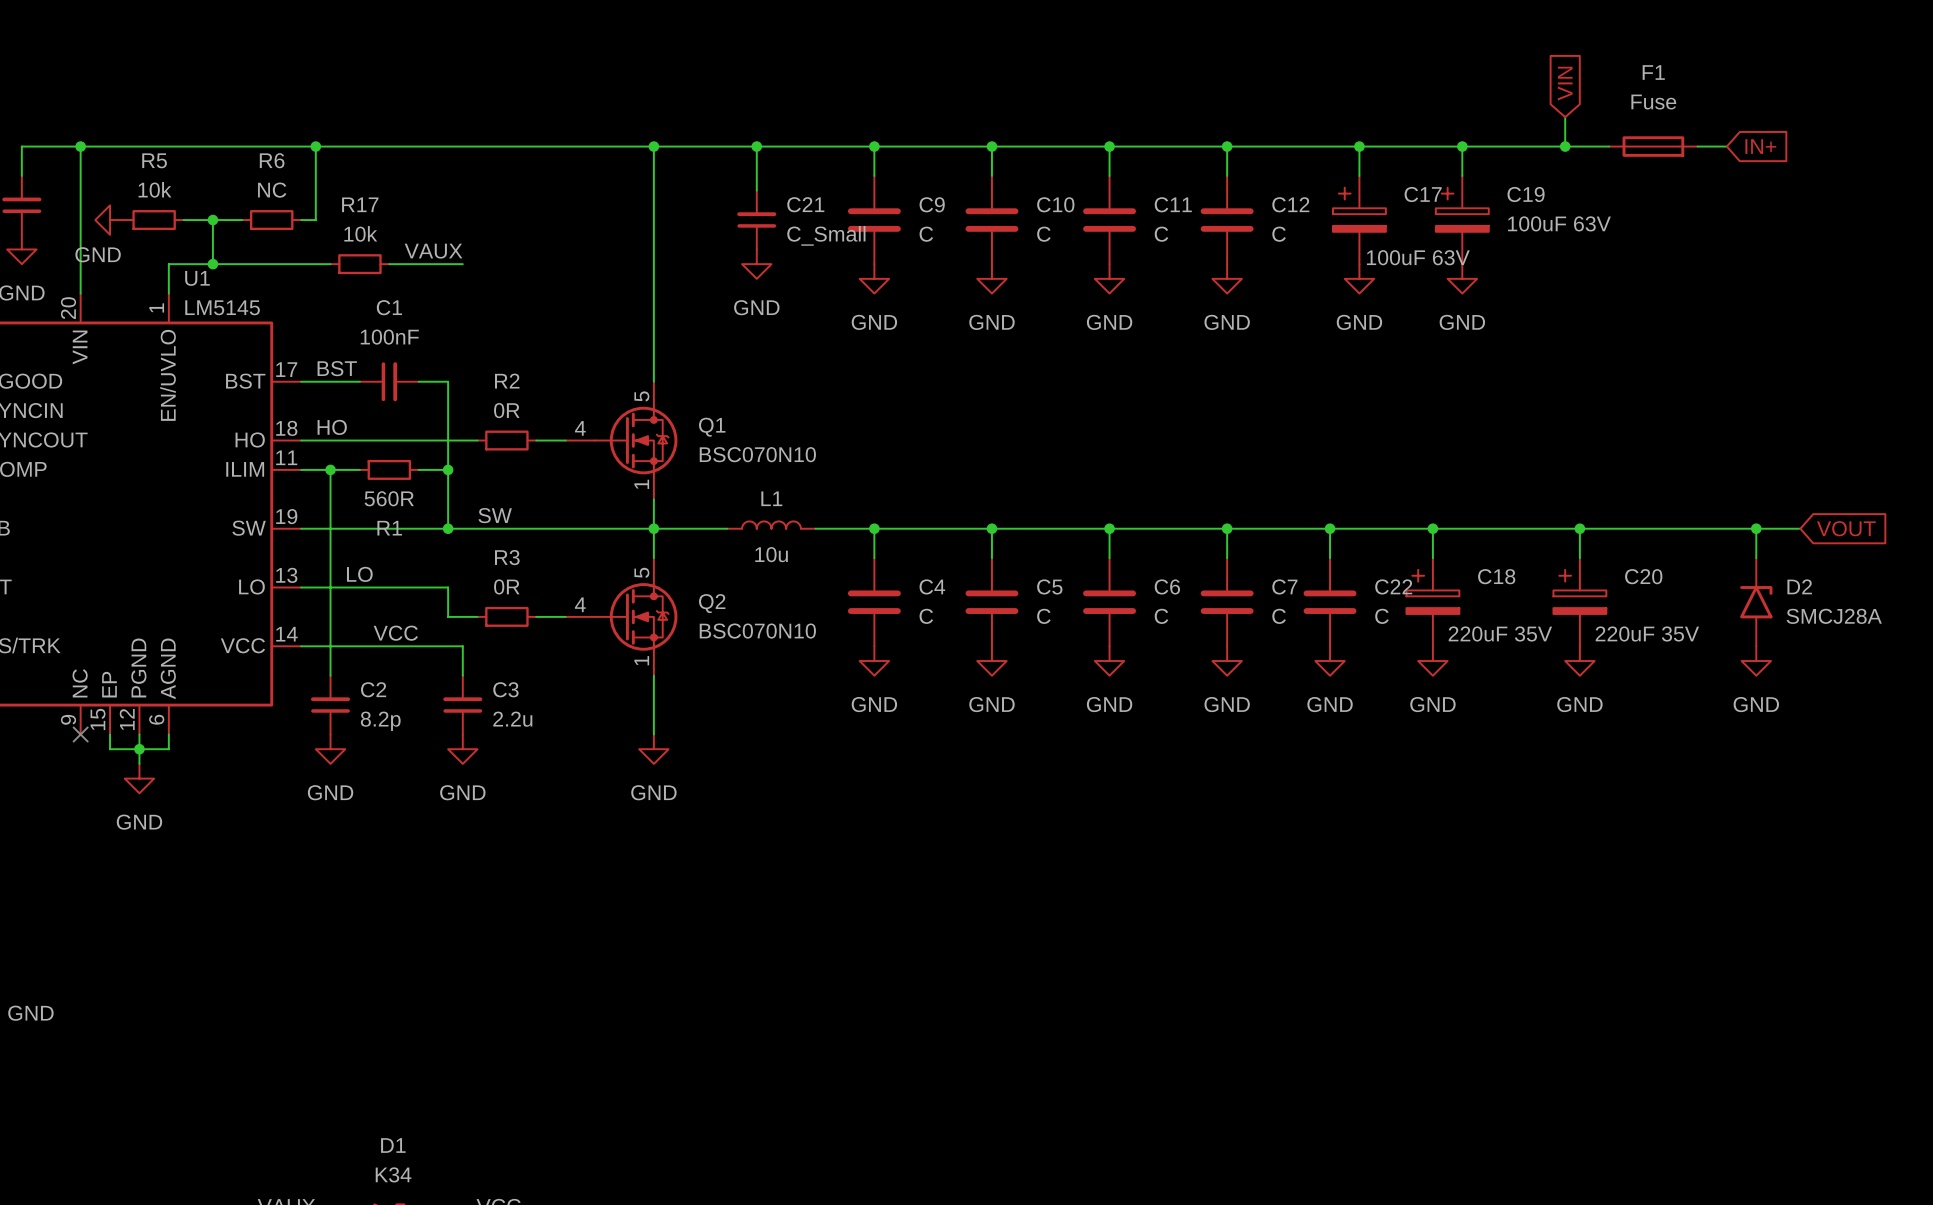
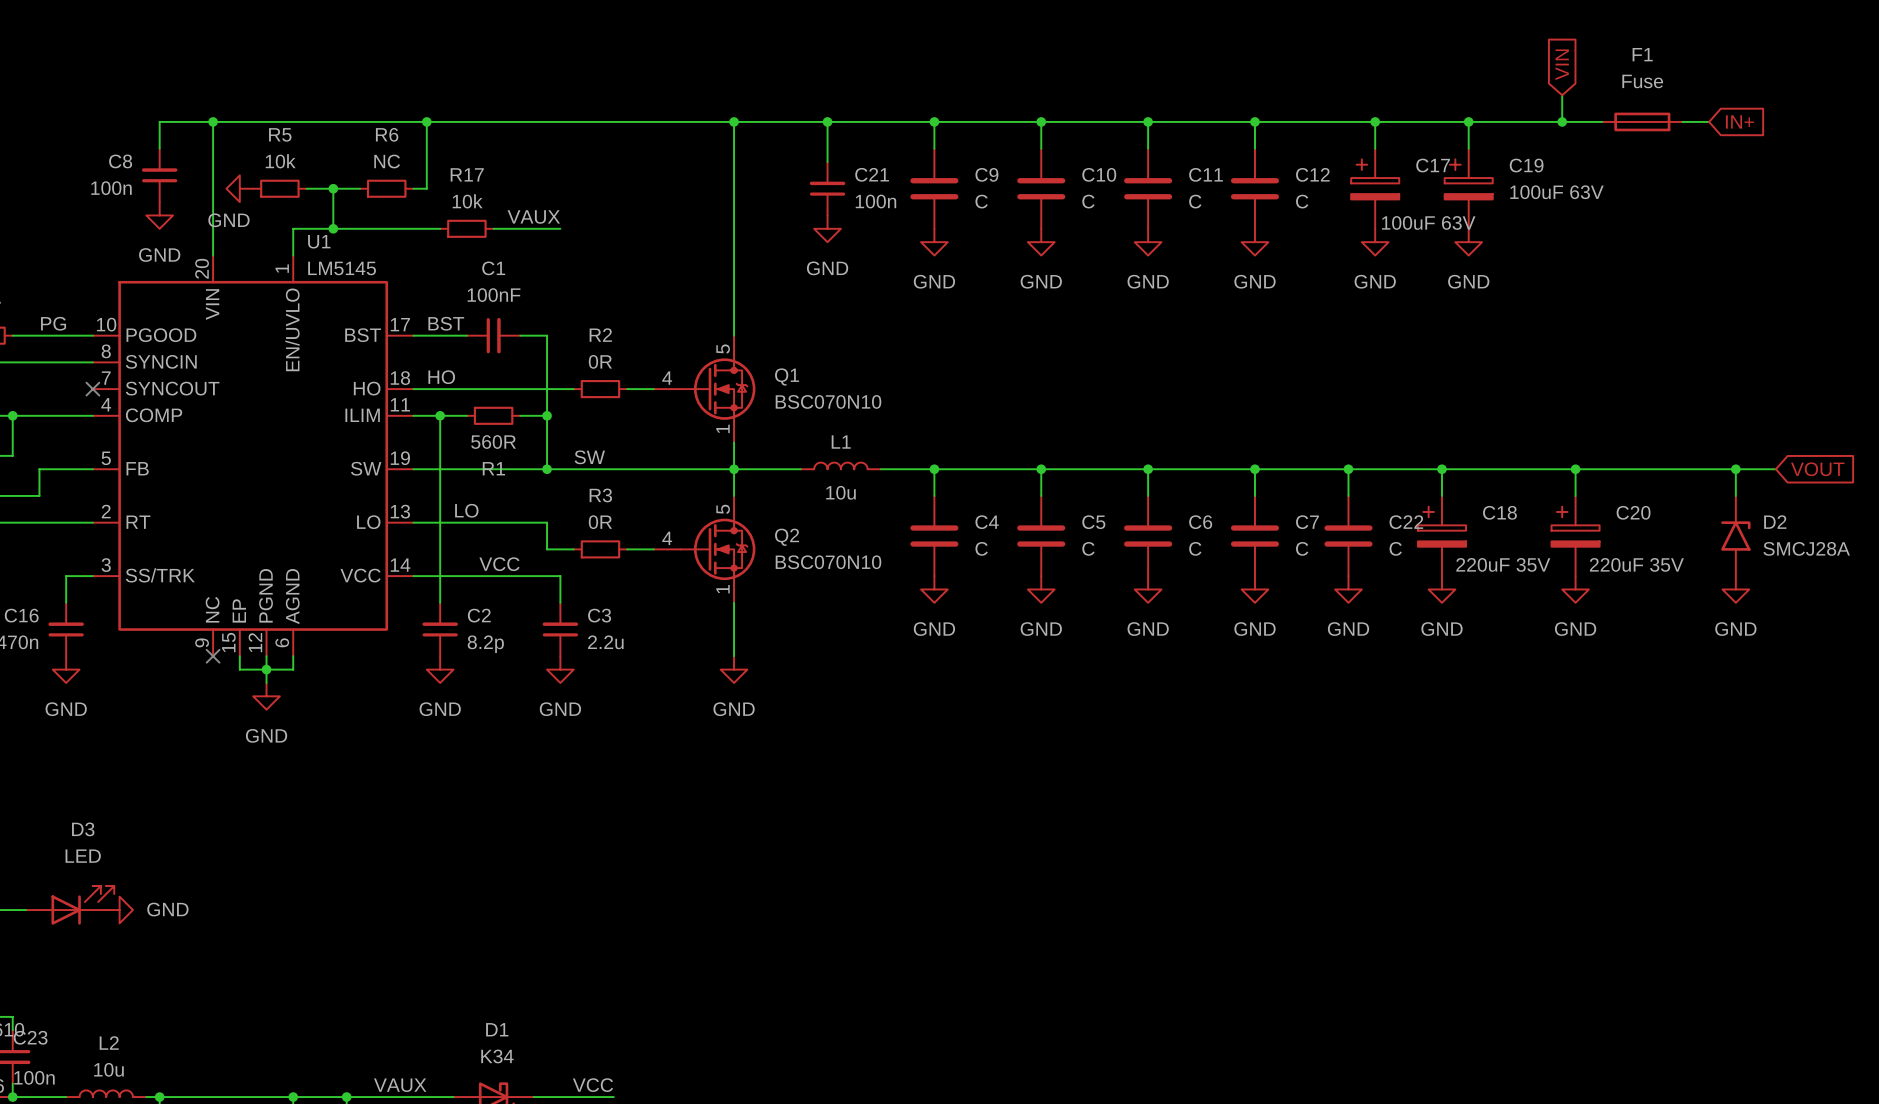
C21 value: C_Small (826, 235) -> 100n (875, 201)

